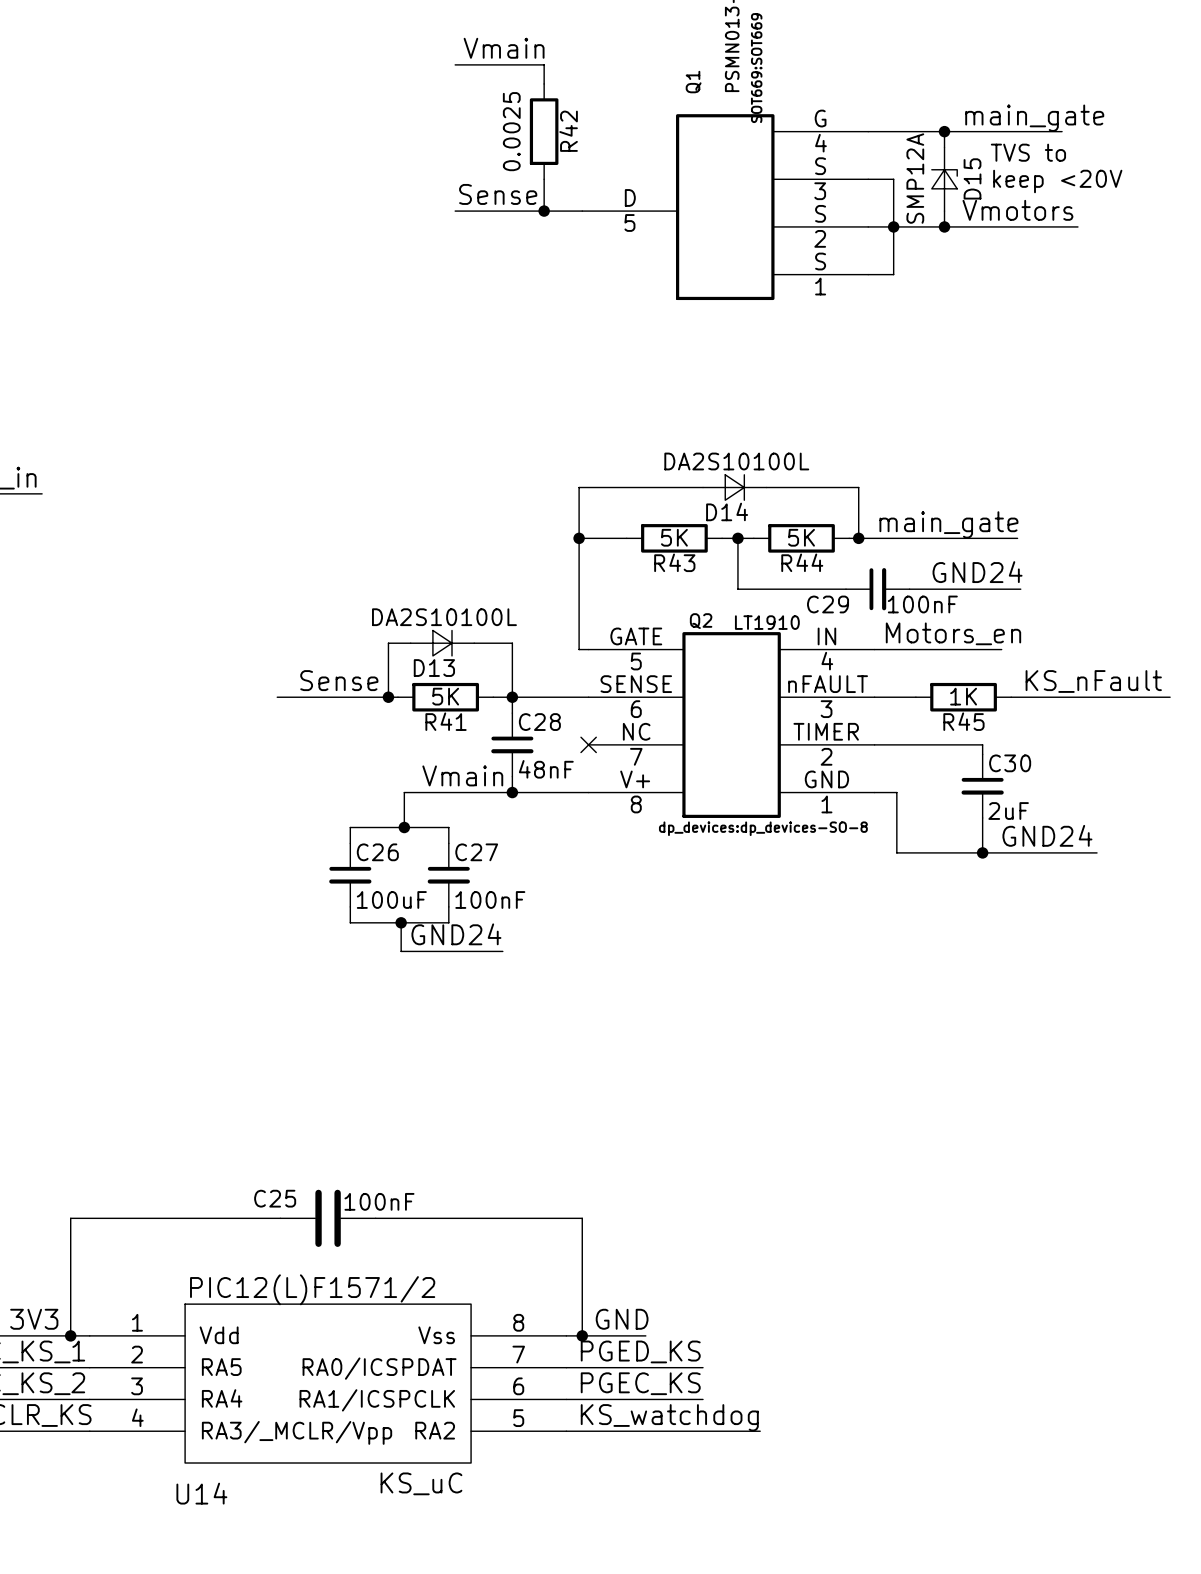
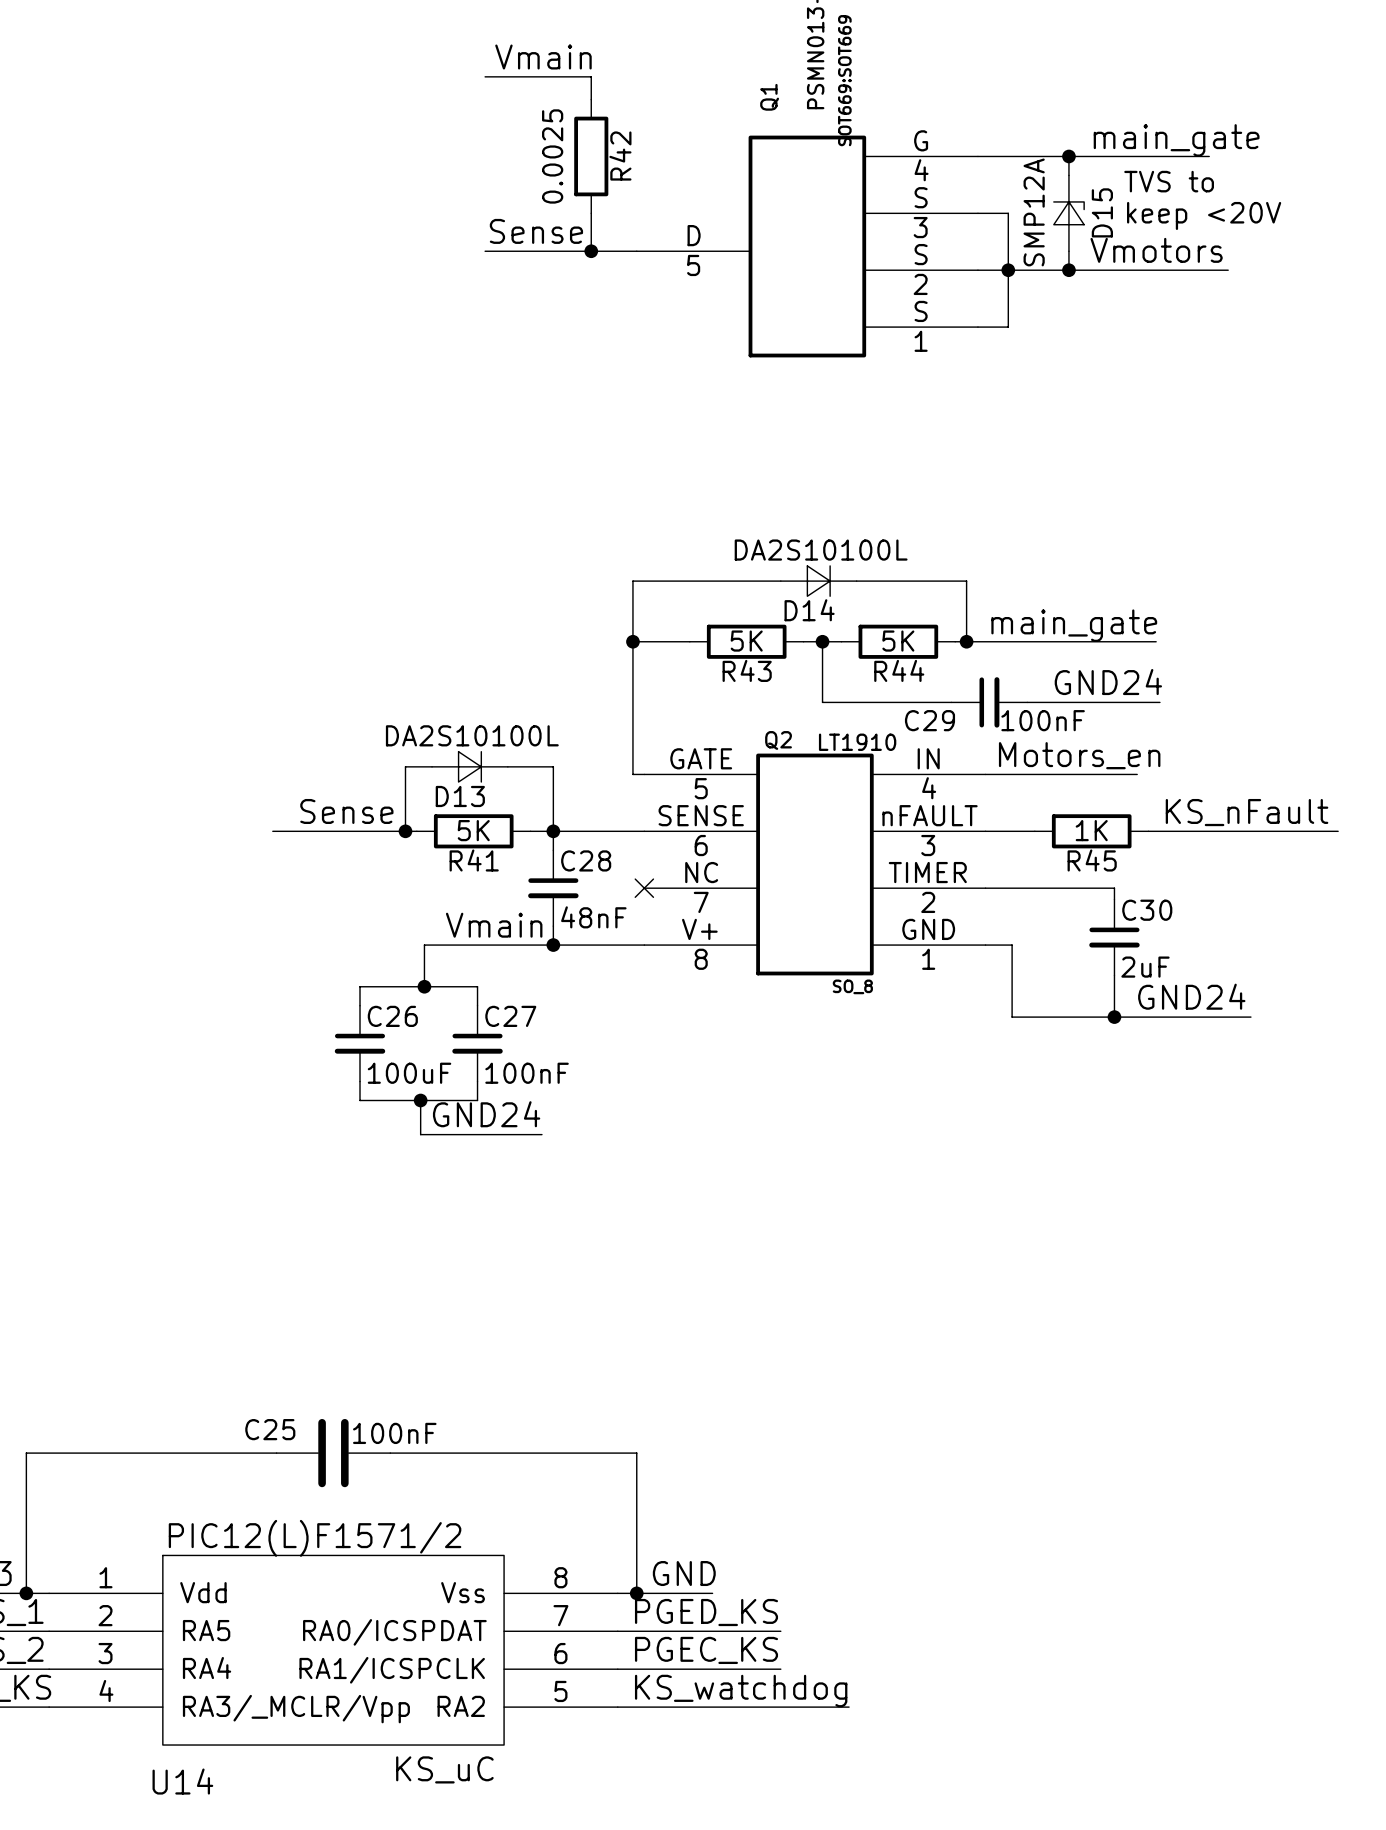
Q2 text: dp_devices:dp_devices-SO-8 (763, 828) -> SO_8 (852, 986)

